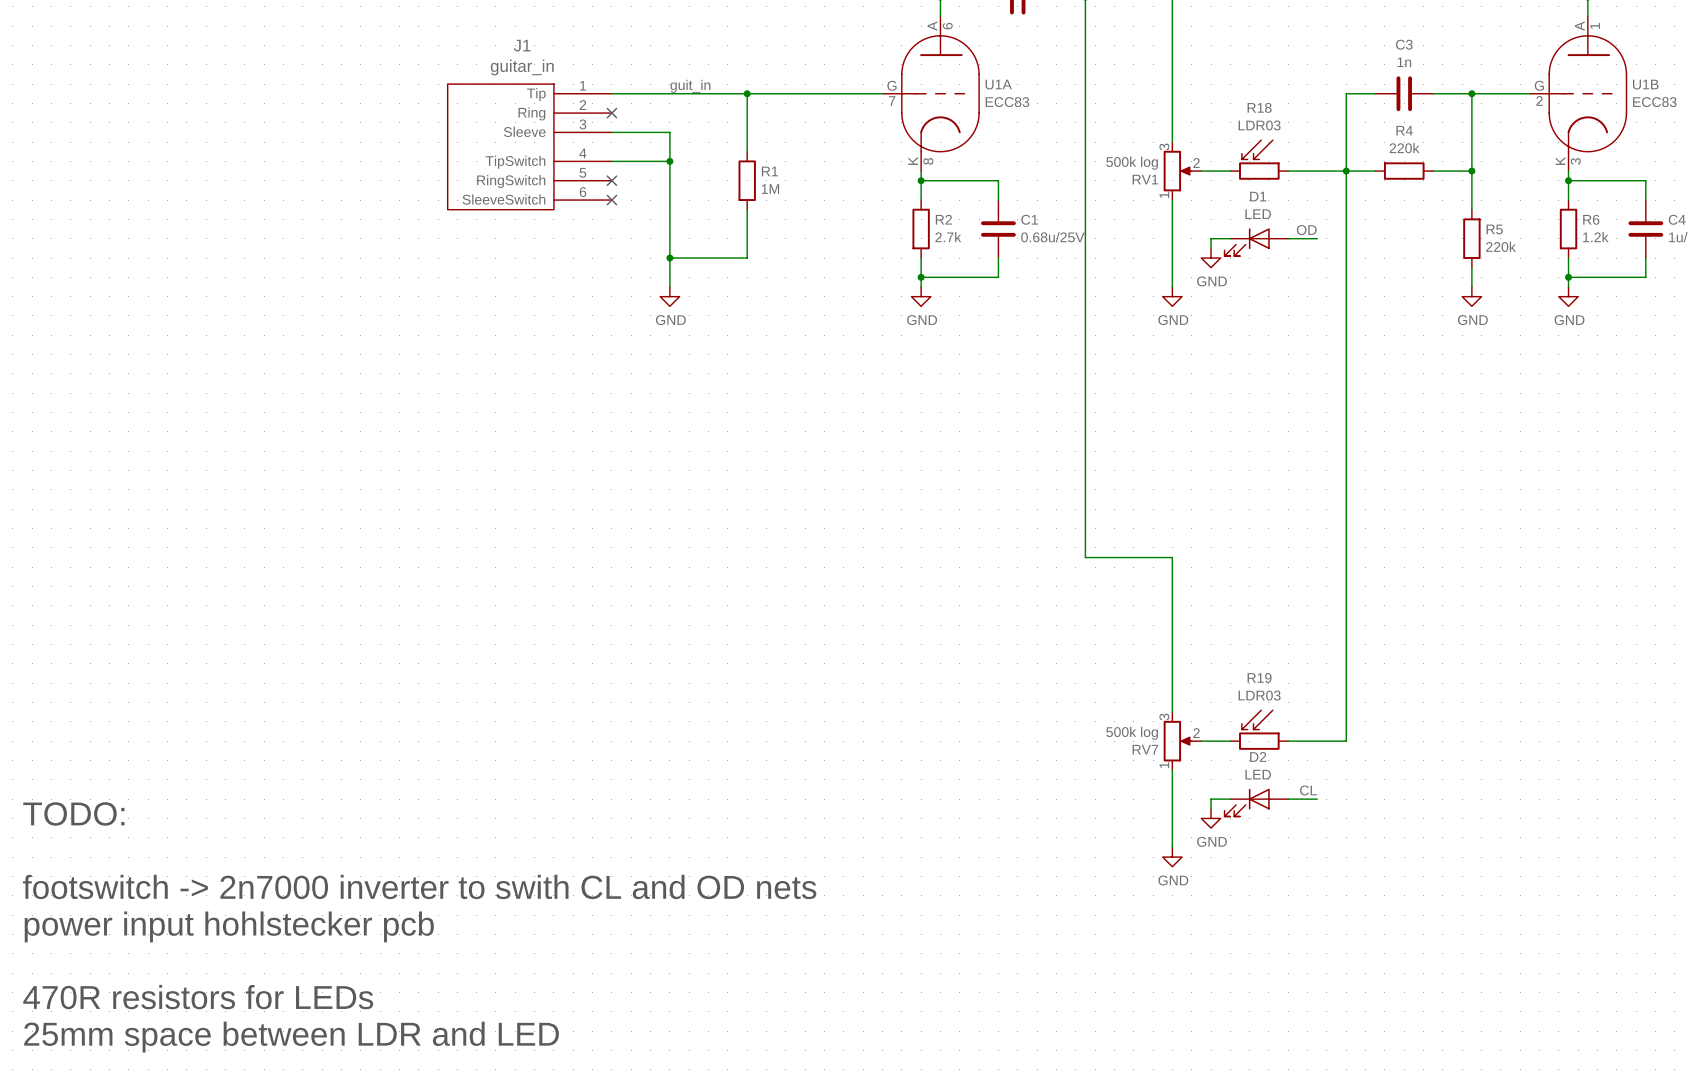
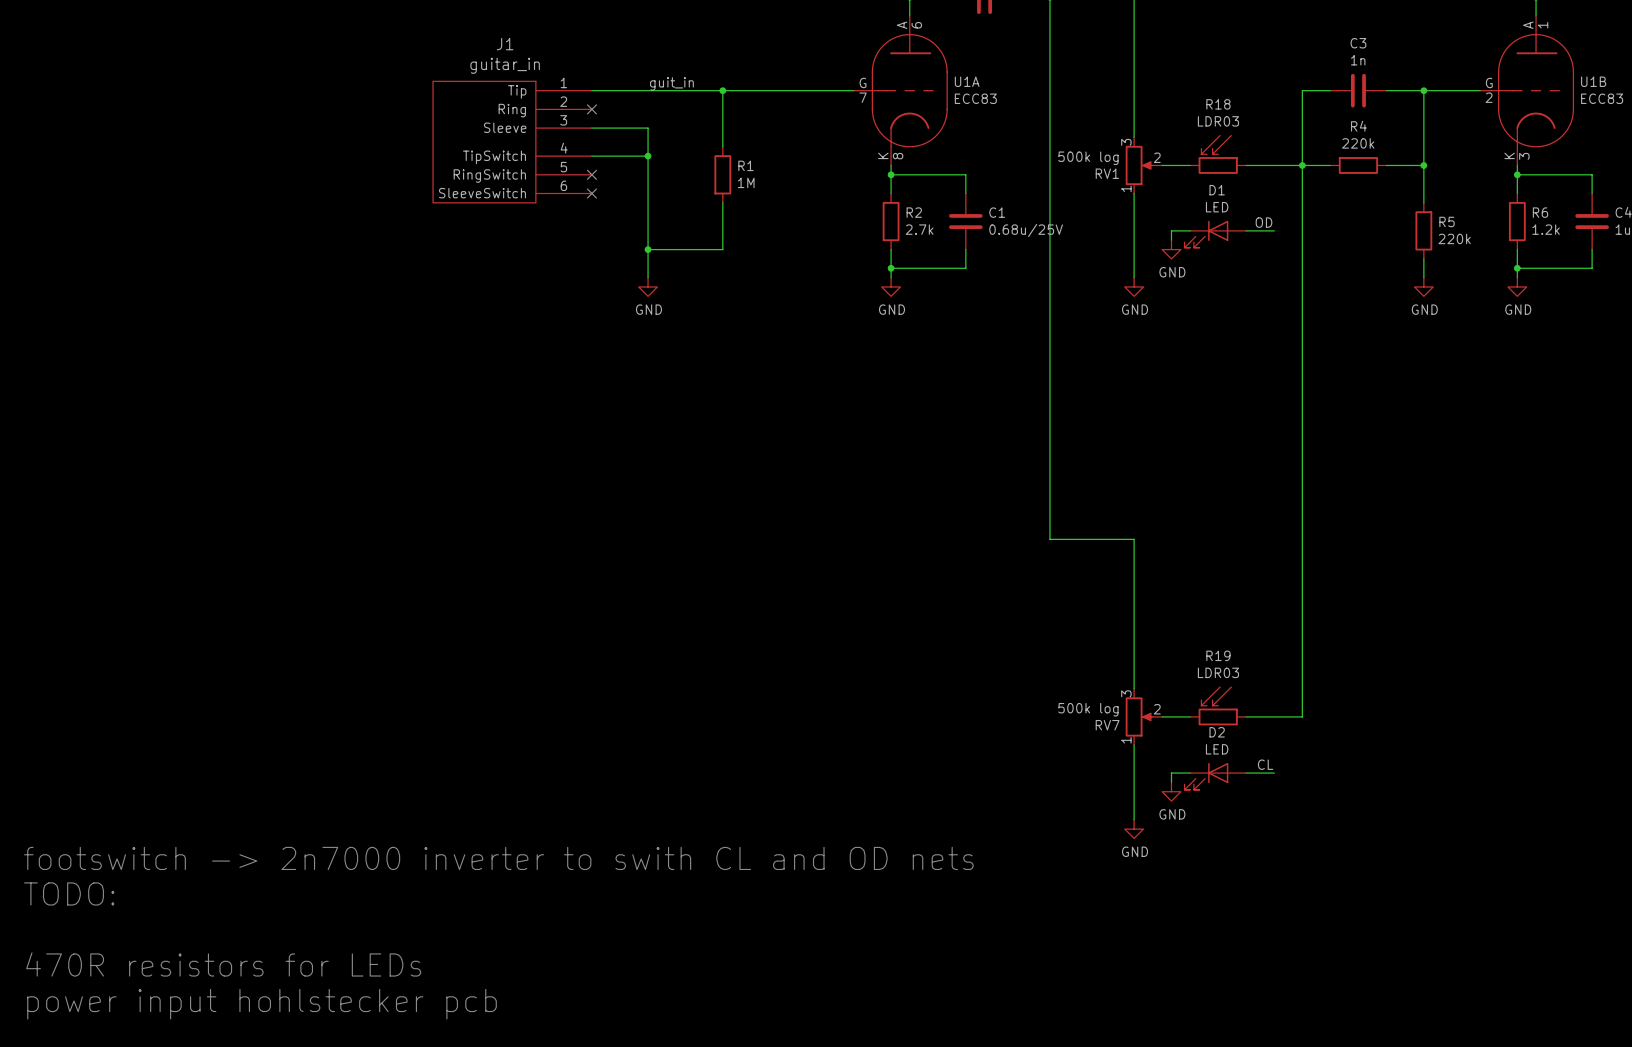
text: TODO: (73, 813) -> none
text: power input hohlstecker pcb (229, 926) -> TODO: (69, 893)
text: 25mm space between LDR and LED (291, 1037) -> power input hohlstecker pcb (262, 1004)

